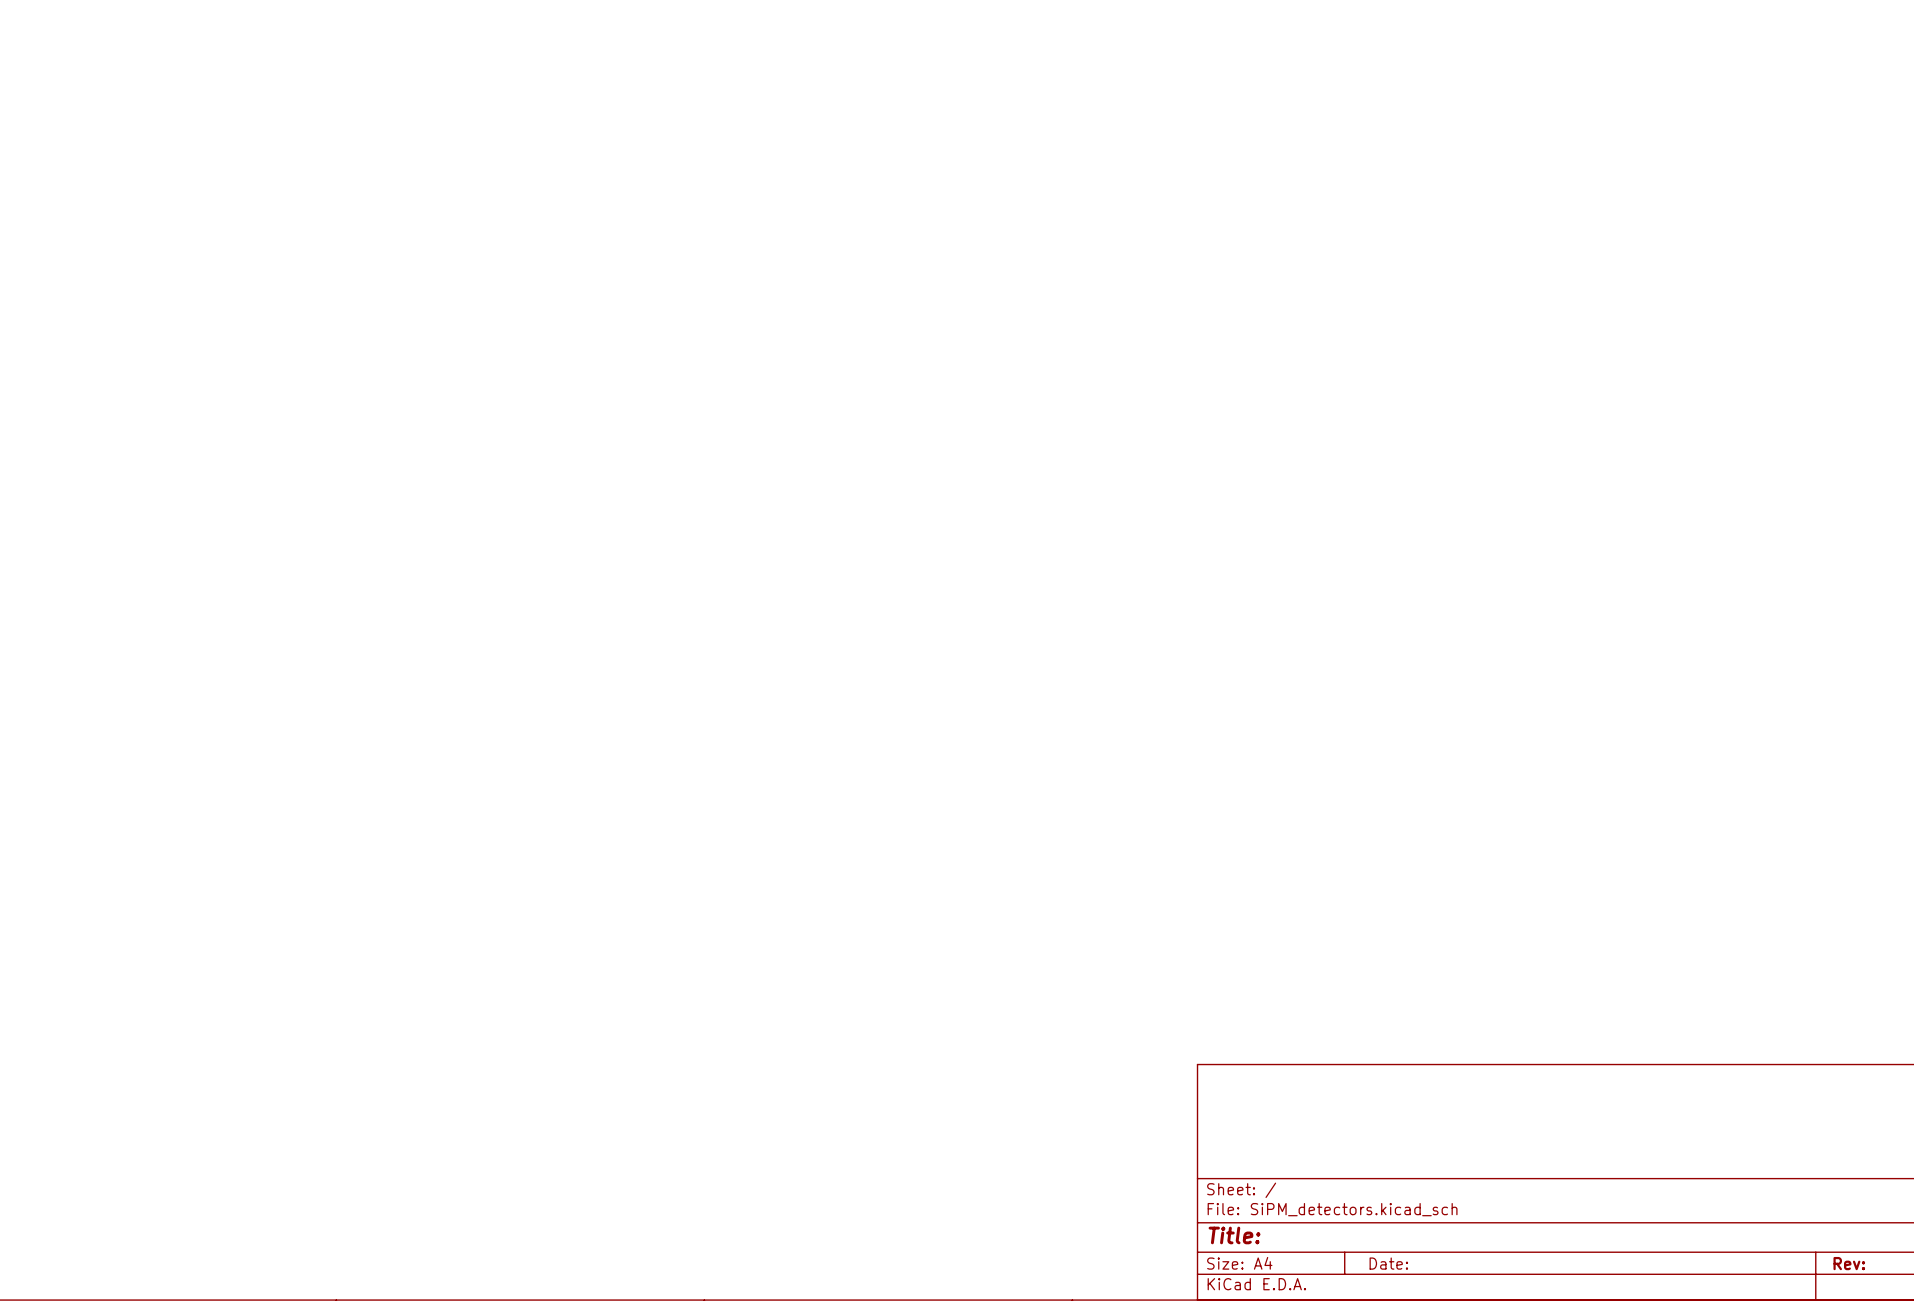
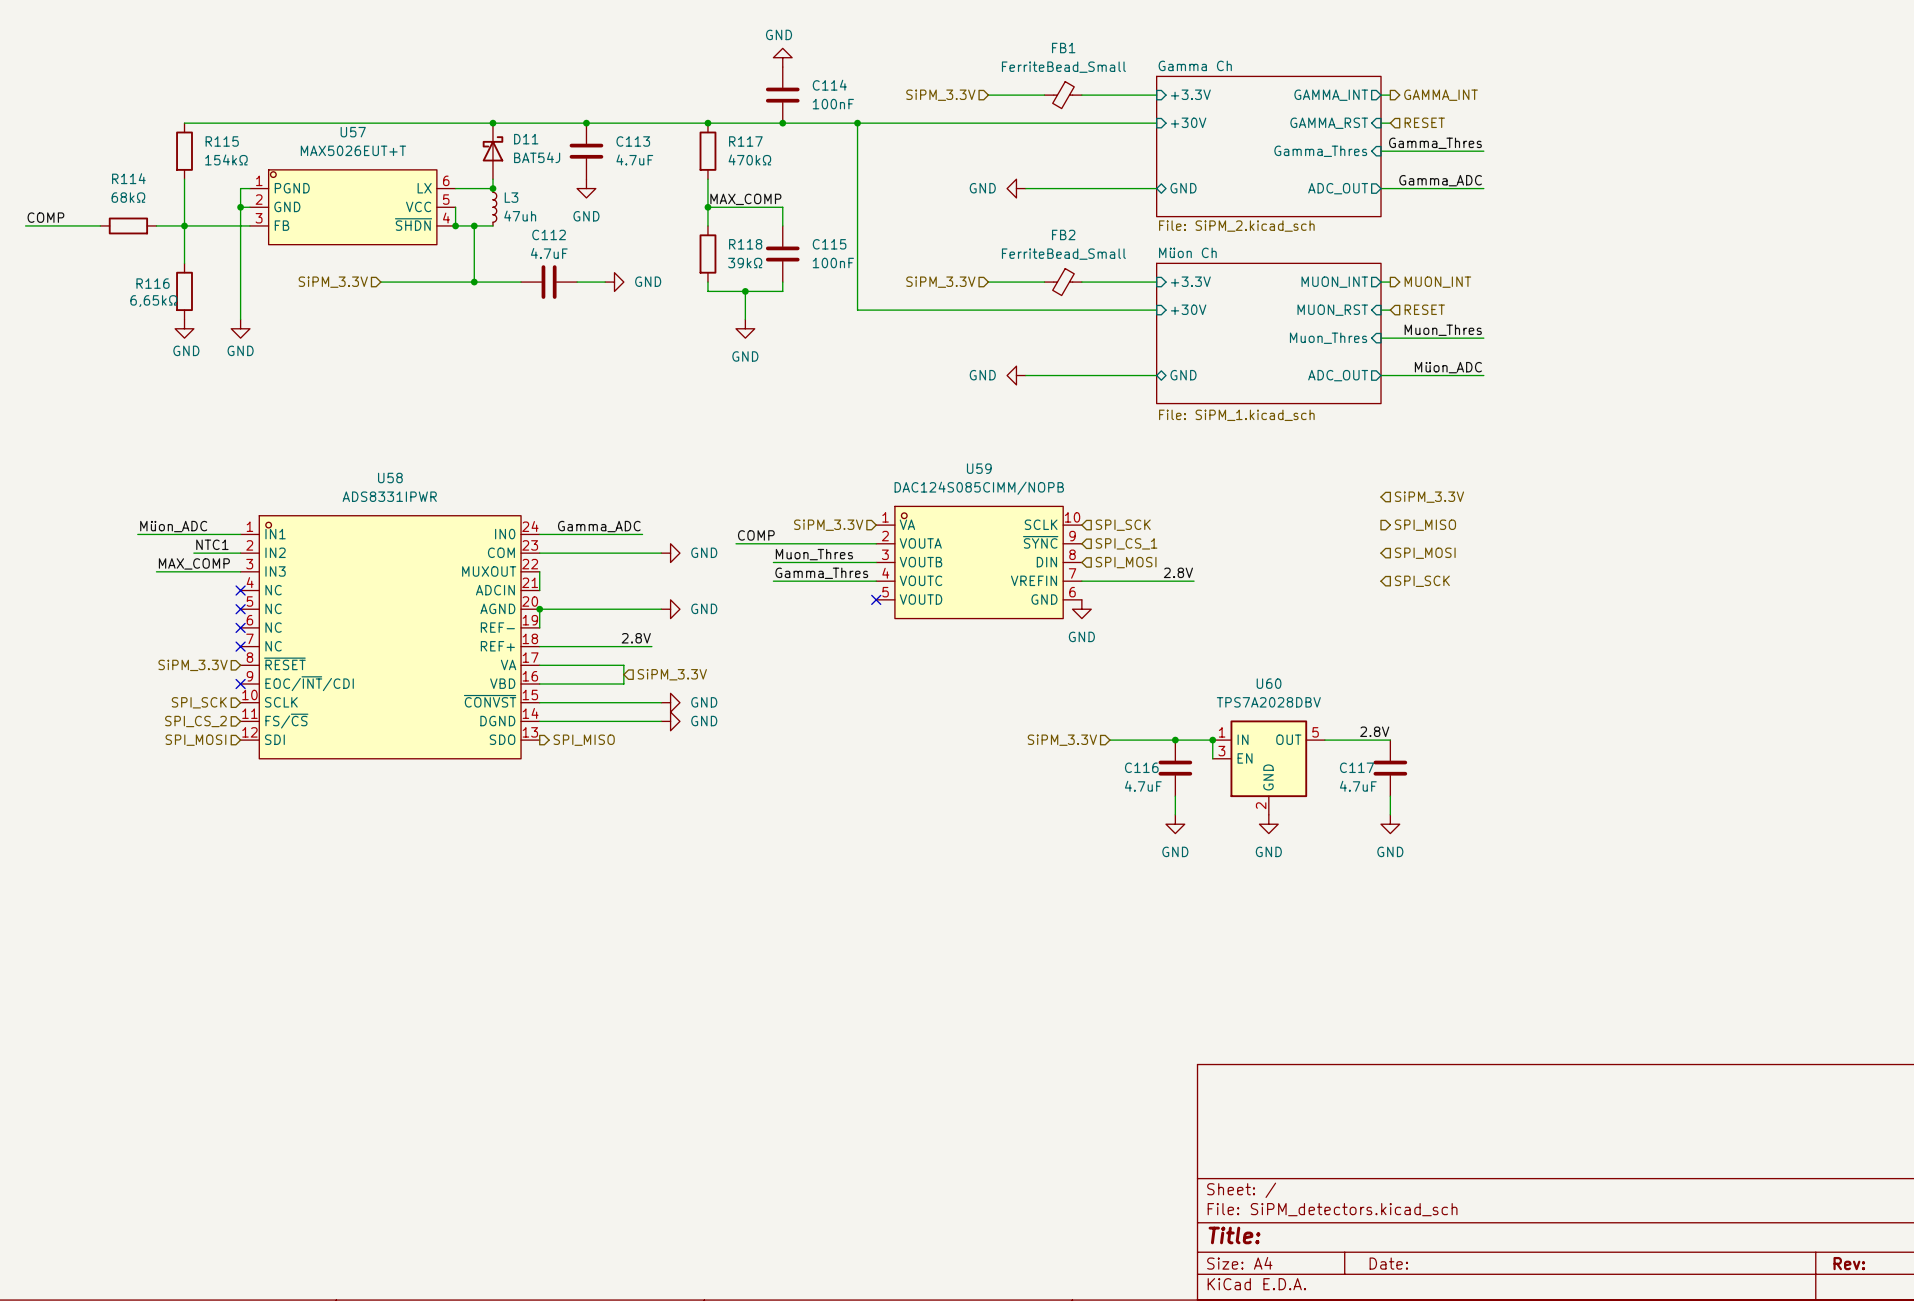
power symbol: none -> GND (782, 57)
sheet pin: none -> +3.3V (1190, 94)
C114: none -> 100nF (782, 95)
hierarchical label: none -> SiPM_3.3V (940, 95)
wire: none -> (988, 95) (1044, 95)
FB1: none -> FerriteBead_Small (1063, 95)
wire: none -> (1081, 95) (1156, 95)
sheet pin: none -> GAMMA_INT (1331, 95)
wire: none -> (1381, 95) (1390, 95)
hierarchical label: none -> GAMMA_INT (1441, 95)
sheet pin: none -> +30V (1188, 122)
hierarchical label: none -> RESET (1424, 122)
wire: none -> (184, 123) (1156, 123)
junction: none -> (492, 123)
junction: none -> (586, 123)
junction: none -> (707, 123)
junction: none -> (782, 123)
wire: none -> (857, 123) (857, 310) (1156, 310)
junction: none -> (857, 123)
sheet pin: none -> GAMMA_RST (1329, 123)
wire: none -> (1381, 123) (1390, 123)
label: none -> Gamma_Thres (1435, 143)
sheet Gamma Ch: none -> File: SiPM_2.kicad_sch (1268, 146)
R115: none -> 154kΩ (184, 151)
D11: none -> BAT54J (492, 151)
C113: none -> 4.7uF (586, 151)
R117: none -> 470kΩ (707, 151)
sheet pin: none -> Gamma_Thres (1320, 151)
wire: none -> (1381, 151) (1483, 151)
wire: none -> (184, 179) (184, 263)
wire: none -> (492, 179) (492, 188) (455, 188)
wire: none -> (707, 179) (707, 225)
label: none -> Gamma_ADC (1440, 180)
wire: none -> (249, 188) (240, 188) (240, 319)
junction: none -> (492, 188)
power symbol: none -> GND (586, 188)
power symbol: none -> GND (1016, 188)
wire: none -> (1025, 188) (1156, 188)
sheet pin: none -> GND (1183, 188)
sheet pin: none -> ADC_OUT (1338, 188)
wire: none -> (1381, 188) (1483, 188)
label: none -> MAX_COMP (745, 199)
wire: none -> (240, 207) (249, 207)
junction: none -> (240, 207)
U57: none -> MAX5026EUT+T (352, 207)
wire: none -> (455, 207) (455, 225) (492, 225)
L3: none -> 47uh (494, 207)
wire: none -> (707, 207) (782, 207) (782, 225)
junction: none -> (707, 207)
label: none -> COMP (45, 217)
wire: none -> (25, 225) (100, 225)
R114: none -> 68kΩ (128, 225)
wire: none -> (156, 225) (249, 225)
junction: none -> (184, 225)
junction: none -> (455, 225)
wire: none -> (474, 225) (474, 282)
junction: none -> (474, 225)
R118: none -> 39kΩ (707, 254)
C115: none -> 100nF (782, 254)
sheet pin: none -> +3.3V (1190, 281)
hierarchical label: none -> SiPM_3.3V (333, 282)
wire: none -> (380, 282) (521, 282)
junction: none -> (474, 282)
C112: none -> 4.7uF (549, 282)
wire: none -> (577, 282) (605, 282)
power symbol: none -> GND (614, 282)
wire: none -> (707, 282) (707, 291) (782, 291) (782, 282)
hierarchical label: none -> SiPM_3.3V (940, 282)
wire: none -> (988, 282) (1044, 282)
FB2: none -> FerriteBead_Small (1063, 282)
wire: none -> (1081, 282) (1156, 282)
sheet pin: none -> MUON_INT (1334, 282)
wire: none -> (1381, 282) (1390, 282)
hierarchical label: none -> MUON_INT (1437, 282)
R116: none -> 6,65kΩ (184, 291)
wire: none -> (745, 291) (745, 319)
junction: none -> (745, 291)
sheet pin: none -> +30V (1188, 309)
hierarchical label: none -> RESET (1424, 309)
sheet pin: none -> MUON_RST (1332, 310)
wire: none -> (1381, 310) (1390, 310)
power symbol: none -> GND (184, 328)
power symbol: none -> GND (240, 328)
power symbol: none -> GND (745, 328)
label: none -> Muon_Thres (1443, 330)
sheet Müon Ch: none -> File: SiPM_1.kicad_sch (1268, 333)
sheet pin: none -> Muon_Thres (1328, 338)
wire: none -> (1381, 338) (1483, 338)
label: none -> Müon_ADC (1448, 367)
power symbol: none -> GND (1016, 375)
wire: none -> (1025, 375) (1156, 375)
sheet pin: none -> GND (1183, 375)
sheet pin: none -> ADC_OUT (1338, 375)
wire: none -> (1381, 375) (1483, 375)
hierarchical label: none -> SiPM_3.3V (1429, 497)
hierarchical label: none -> SiPM_3.3V (828, 525)
hierarchical label: none -> SPI_SCK (1123, 525)
hierarchical label: none -> SPI_MISO (1425, 525)
label: none -> Müon_ADC (173, 526)
label: none -> Gamma_ADC (599, 526)
wire: none -> (137, 534) (240, 534)
wire: none -> (539, 534) (642, 534)
label: none -> COMP (756, 535)
wire: none -> (736, 543) (876, 543)
hierarchical label: none -> SPI_CS_1 (1126, 543)
label: none -> NTC1 (212, 544)
wire: none -> (193, 553) (240, 553)
wire: none -> (539, 553) (661, 553)
power symbol: none -> GND (670, 553)
hierarchical label: none -> SPI_MOSI (1425, 553)
label: none -> Muon_Thres (814, 554)
wire: none -> (773, 562) (876, 562)
U59: none -> DAC124S085CIMM/NOPB (979, 562)
hierarchical label: none -> SPI_MOSI (1126, 562)
label: none -> MAX_COMP (194, 563)
wire: none -> (156, 571) (240, 571)
wire: none -> (539, 571) (539, 590)
label: none -> 2.8V (1178, 572)
label: none -> Gamma_Thres (821, 573)
wire: none -> (773, 581) (876, 581)
wire: none -> (1081, 581) (1194, 581)
hierarchical label: none -> SPI_SCK (1422, 581)
no-connect mark: none -> (240, 590)
no-connect mark: none -> (876, 599)
no-connect mark: none -> (240, 609)
junction: none -> (539, 609)
wire: none -> (661, 609) (539, 609) (539, 627)
power symbol: none -> GND (670, 609)
power symbol: none -> GND (1081, 609)
no-connect mark: none -> (240, 627)
U58: none -> ADS8331IPWR (390, 637)
label: none -> 2.8V (636, 638)
no-connect mark: none -> (240, 646)
wire: none -> (539, 646) (651, 646)
hierarchical label: none -> SiPM_3.3V (193, 665)
wire: none -> (539, 665) (623, 665) (623, 684) (539, 684)
hierarchical label: none -> SiPM_3.3V (672, 674)
no-connect mark: none -> (240, 684)
hierarchical label: none -> SPI_SCK (199, 702)
wire: none -> (539, 702) (661, 702)
power symbol: none -> GND (670, 702)
hierarchical label: none -> SPI_CS_2 (195, 721)
wire: none -> (539, 721) (661, 721)
power symbol: none -> GND (670, 721)
label: none -> 2.8V (1374, 731)
hierarchical label: none -> SPI_MOSI (195, 740)
hierarchical label: none -> SPI_MISO (584, 740)
hierarchical label: none -> SiPM_3.3V (1062, 740)
wire: none -> (1109, 740) (1212, 740) (1212, 758)
junction: none -> (1175, 740)
junction: none -> (1212, 740)
wire: none -> (1324, 740) (1390, 740)
U60: none -> TPS7A2028DBV (1268, 767)
C116: none -> 4.7uF (1175, 768)
C117: none -> 4.7uF (1390, 768)
wire: none -> (1175, 796) (1175, 814)
wire: none -> (1390, 796) (1390, 814)
power symbol: none -> GND (1175, 824)
power symbol: none -> GND (1268, 824)
power symbol: none -> GND (1390, 824)

